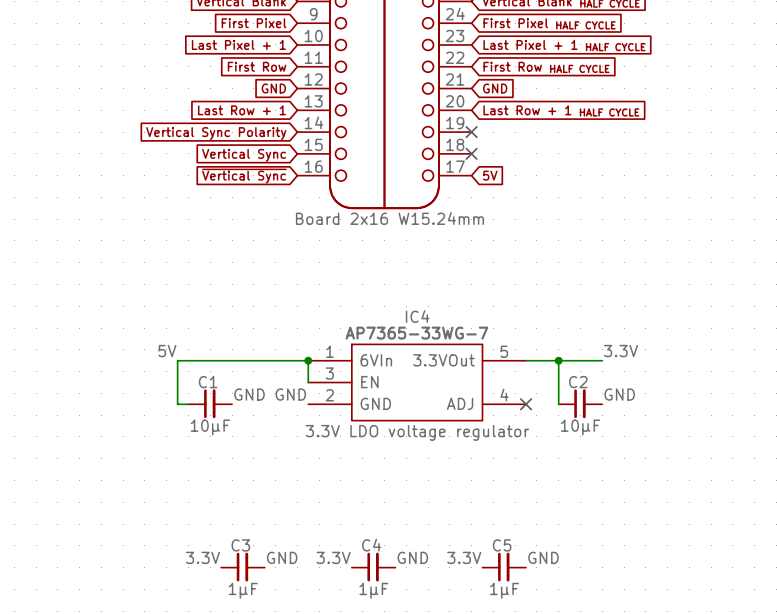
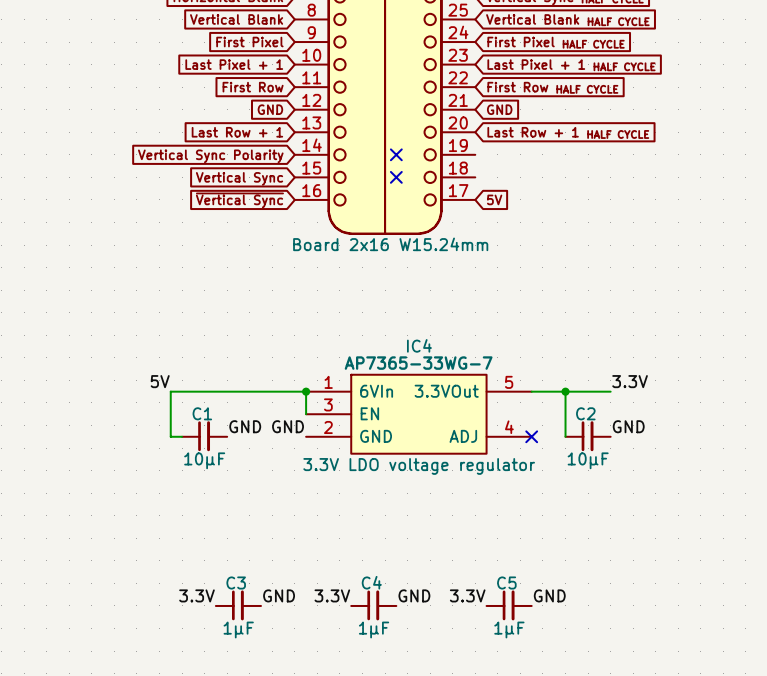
no-connect mark: none -> (396, 154)
no-connect mark: (471, 132) -> none
no-connect mark: none -> (396, 177)
no-connect mark: (471, 153) -> none

